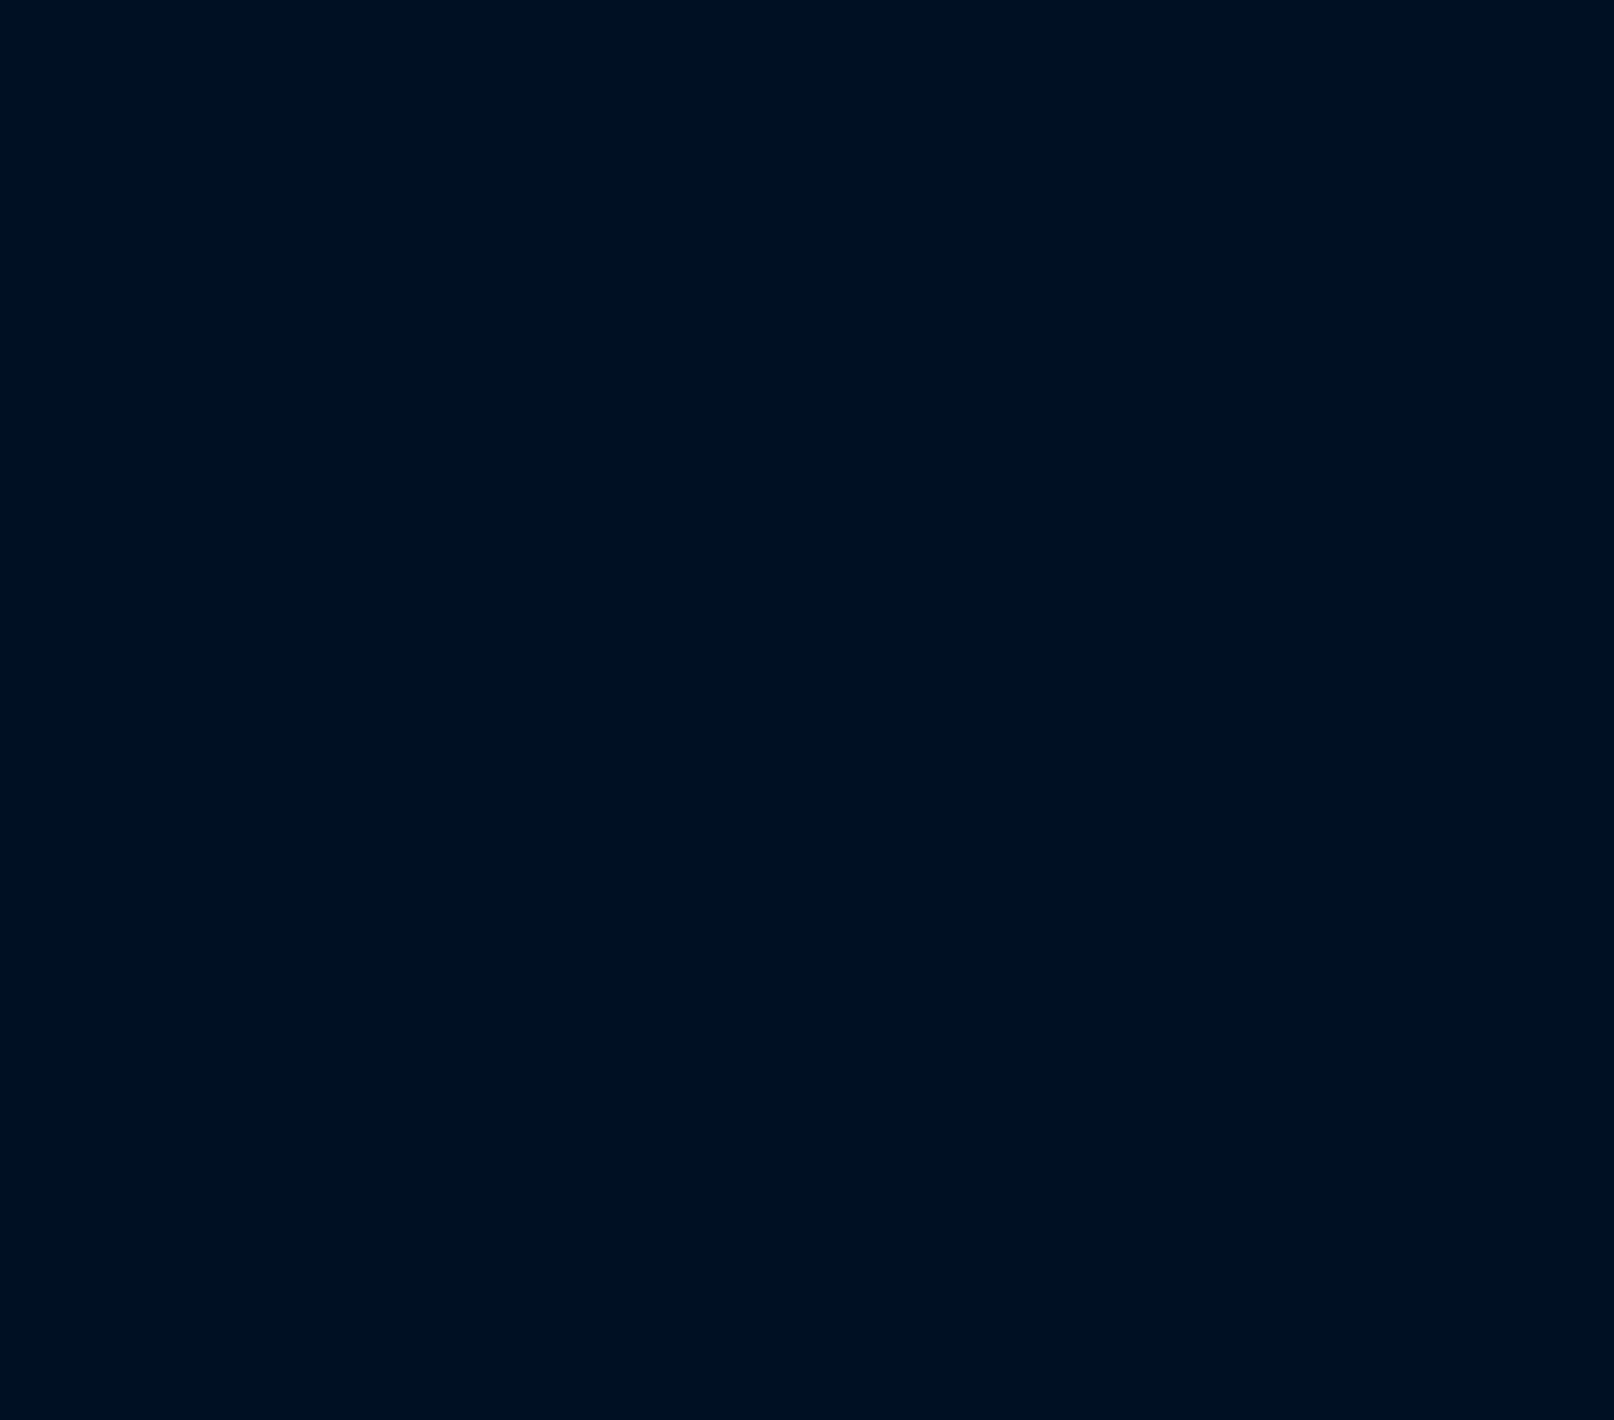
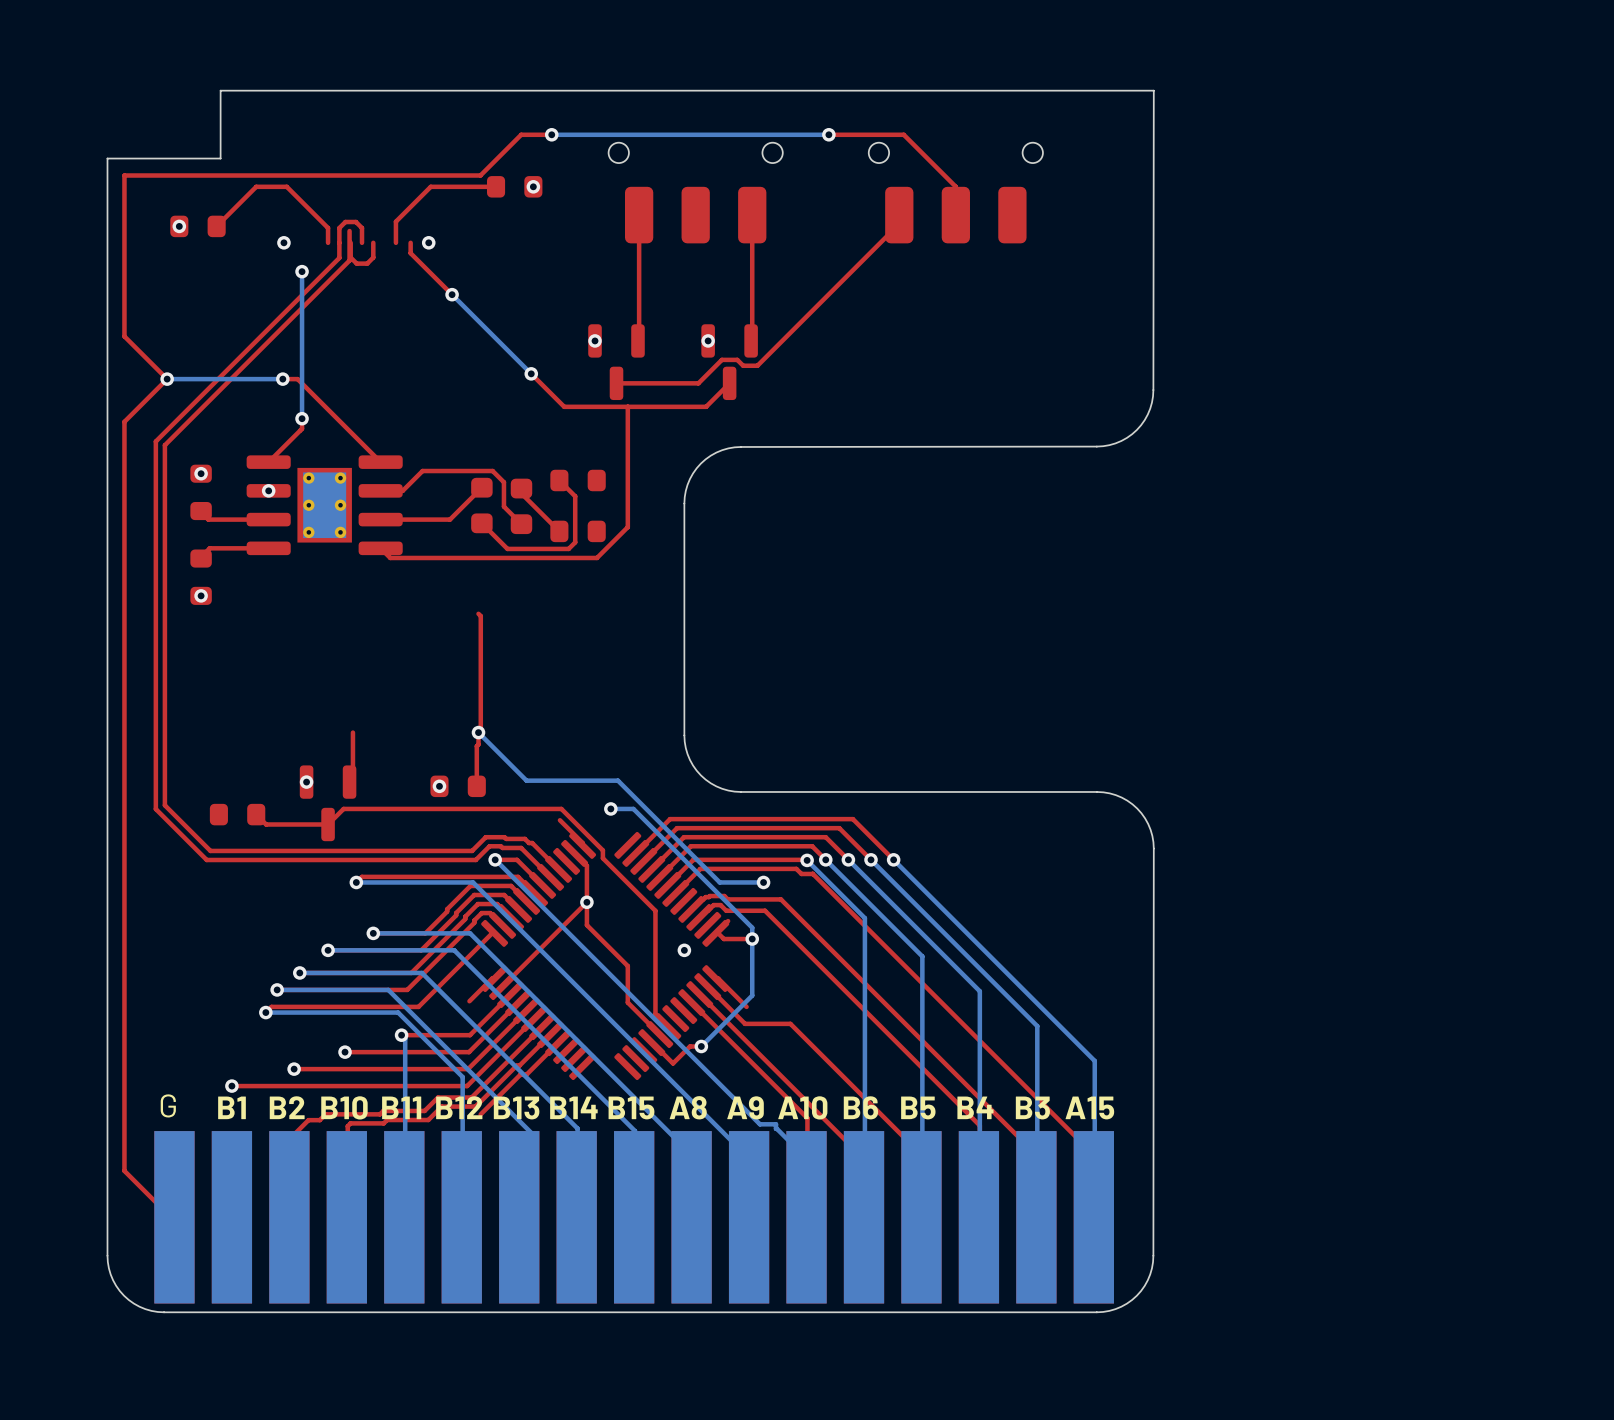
board edge: none -> (1153, 90) (1153, 396) (1147, 414) (1132, 434) (1115, 443) (1096, 446) (734, 447) (710, 455) (696, 468) (687, 484) (684, 503) (684, 741) (693, 765) (710, 783) (722, 788) (740, 791) (1103, 792) (1127, 800) (1145, 818) (1150, 829) (1153, 848) (1153, 1255) (1150, 1274) (1141, 1291) (1121, 1306) (1096, 1312) (164, 1312) (145, 1309) (128, 1299) (113, 1280) (107, 1255) (107, 158) (220, 158) (220, 90) (1153, 90)
top track: none -> (551, 134) (521, 134) (480, 175) (124, 175) (124, 336) (167, 379) (124, 421) (124, 1170) (175, 1221)
via: none -> (551, 134)
top track: none -> (828, 134) (903, 134) (955, 186) (955, 215)
bottom track: none -> (828, 134) (551, 134)
via: none -> (828, 134)
top track: none -> (496, 186) (430, 186) (395, 221) (395, 242)
part: none -> (514, 186)
via: none -> (533, 186)
part: none -> (695, 193)
part: none -> (955, 193)
top track: none -> (639, 215) (638, 340)
top track: none -> (752, 215) (751, 340)
top track: none -> (899, 215) (899, 223) (757, 365) (743, 365) (737, 359) (721, 359) (698, 383) (616, 383)
via: none -> (179, 226)
part: none -> (197, 226)
top track: none -> (216, 226) (256, 186) (286, 186) (328, 228) (328, 242)
top track: none -> (349, 231) (349, 260) (164, 445) (164, 805) (210, 850) (472, 850) (485, 837) (504, 837) (506, 838) (524, 838) (529, 843) (532, 843) (558, 869)
via: none -> (283, 242)
top track: none -> (362, 242) (362, 228) (355, 221) (345, 221) (339, 228) (339, 257) (155, 441) (155, 809) (206, 860) (475, 860) (489, 846) (500, 846) (502, 847) (521, 847) (550, 877)
top track: none -> (373, 242) (373, 257) (367, 263) (356, 263) (350, 257) (350, 242)
top track: none -> (410, 242) (410, 253) (452, 294)
via: none -> (428, 242)
bottom track: none -> (302, 271) (302, 418)
via: none -> (302, 271)
bottom track: none -> (452, 294) (531, 373)
via: none -> (452, 294)
via: none -> (595, 340)
via: none -> (708, 340)
part: none -> (616, 362)
part: none -> (729, 362)
top track: none -> (531, 373) (564, 406) (706, 406) (729, 383)
via: none -> (531, 373)
via: none -> (167, 379)
top track: none -> (282, 379) (297, 379) (380, 462)
bottom track: none -> (282, 379) (167, 379)
via: none -> (282, 379)
top track: none -> (627, 406) (627, 527) (597, 557) (390, 557) (380, 548)
top track: none -> (302, 418) (302, 428) (268, 462)
via: none -> (302, 418)
via: none -> (201, 473)
top track: none -> (559, 480) (575, 496) (575, 542) (568, 548) (507, 548) (481, 523)
part: none -> (578, 480)
top track: none -> (481, 487) (450, 519) (380, 519)
top track: none -> (521, 488) (521, 493) (559, 531)
via: none -> (268, 490)
top track: none -> (380, 490) (402, 490) (422, 471) (492, 471) (503, 482) (503, 506) (521, 524)
part: none -> (201, 492)
part: none -> (324, 505)
part: none -> (481, 505)
part: none -> (521, 506)
top track: none -> (200, 512) (208, 519) (268, 519)
part: none -> (578, 531)
top track: none -> (268, 548) (209, 548) (200, 557)
part: none -> (201, 577)
via: none -> (201, 595)
top track: none -> (478, 613) (480, 616) (480, 730) (478, 732) (476, 746) (476, 786)
top track: none -> (352, 732) (352, 778) (349, 782)
bottom track: none -> (478, 732) (526, 780) (617, 780) (719, 882) (763, 882)
via: none -> (478, 732)
via: none -> (306, 782)
via: none -> (439, 786)
part: none -> (458, 786)
part: none -> (328, 803)
bottom track: none -> (610, 808) (633, 808) (752, 927) (752, 995) (701, 1046)
via: none -> (610, 808)
part: none -> (237, 814)
top track: none -> (256, 814) (266, 824) (328, 824) (343, 808) (561, 808) (602, 850) (602, 858) (655, 910) (655, 1014) (667, 1026)
top track: none -> (559, 820) (582, 842) (582, 845)
top track: none -> (574, 853) (586, 865) (586, 925) (627, 966) (627, 1002) (659, 1034)
top track: none -> (635, 853) (670, 819) (852, 819) (893, 859)
top track: none -> (495, 859) (517, 859) (542, 885)
bottom track: none -> (495, 859) (759, 1124) (776, 1124) (776, 1128) (807, 1159) (807, 1221)
via: none -> (495, 859)
top track: none -> (825, 859) (812, 846) (690, 846) (659, 877)
bottom track: none -> (825, 859) (922, 956) (922, 1221)
via: none -> (825, 859)
top track: none -> (848, 859) (825, 837) (683, 837) (651, 869)
bottom track: none -> (848, 859) (979, 991) (979, 1221)
via: none -> (848, 859)
top track: none -> (871, 859) (839, 828) (677, 828) (643, 861)
bottom track: none -> (871, 859) (1037, 1026) (1037, 1221)
via: none -> (871, 859)
bottom track: none -> (893, 859) (1094, 1060) (1094, 1221)
via: none -> (893, 859)
top track: none -> (807, 860) (693, 859) (667, 885)
bottom track: none -> (807, 860) (864, 918) (864, 1221)
via: none -> (807, 860)
top track: none -> (812, 873) (1094, 1155) (1094, 1221)
top track: none -> (812, 873) (801, 873) (796, 868) (700, 868) (675, 893)
top track: none -> (356, 882) (361, 876) (518, 876) (534, 893)
bottom track: none -> (356, 882) (473, 882) (749, 1159) (749, 1221)
via: none -> (356, 882)
via: none -> (763, 882)
top track: none -> (526, 901) (511, 885) (470, 885) (425, 933) (373, 933)
top track: none -> (586, 902) (502, 986)
via: none -> (586, 902)
top track: none -> (518, 909) (504, 894) (474, 894) (421, 950) (328, 950)
top track: none -> (691, 909) (701, 899) (709, 896) (724, 896) (727, 899) (780, 899) (1037, 1155) (1037, 1221)
top track: none -> (510, 917) (497, 904) (477, 904) (411, 972) (299, 972)
top track: none -> (699, 917) (713, 905) (720, 905) (726, 910) (765, 910) (979, 1125) (979, 1221)
top track: none -> (728, 921) (715, 933) (723, 939) (752, 939)
top track: none -> (502, 925) (490, 913) (481, 913) (407, 989) (277, 989)
bottom track: none -> (373, 933) (470, 933) (692, 1155) (692, 1221)
via: none -> (373, 933)
top track: none -> (494, 933) (492, 933) (418, 1006) (271, 1006) (265, 1012)
via: none -> (752, 939)
bottom track: none -> (328, 950) (454, 950) (635, 1131) (635, 1221)
via: none -> (328, 950)
via: none -> (684, 950)
part: none -> (605, 955)
bottom track: none -> (299, 972) (421, 972) (577, 1128) (577, 1221)
via: none -> (299, 972)
top track: none -> (494, 978) (492, 978) (469, 1001)
top track: none -> (715, 978) (718, 978) (746, 1006)
top track: none -> (707, 986) (745, 1023) (790, 1023) (922, 1155) (922, 1221)
bottom track: none -> (277, 989) (388, 989) (531, 1133) (531, 1221)
via: none -> (277, 989)
top track: none -> (510, 994) (470, 1035) (401, 1035)
top track: none -> (699, 994) (864, 1159) (864, 1221)
top track: none -> (518, 1002) (469, 1052) (345, 1052)
top track: none -> (691, 1002) (807, 1118) (807, 1221)
top track: none -> (526, 1010) (468, 1069) (294, 1069)
bottom track: none -> (265, 1012) (398, 1012) (462, 1077) (462, 1221)
via: none -> (265, 1012)
top track: none -> (534, 1018) (467, 1086) (231, 1086)
top track: none -> (542, 1026) (471, 1097) (438, 1097) (424, 1110) (383, 1110) (379, 1114) (325, 1114) (319, 1120) (308, 1120) (290, 1138) (290, 1221)
top track: none -> (550, 1034) (479, 1103)
bottom track: none -> (401, 1035) (405, 1038) (405, 1221)
via: none -> (401, 1035)
top track: none -> (558, 1042) (526, 1074) (520, 1074) (480, 1114)
top track: none -> (652, 1042) (673, 1063) (690, 1046) (701, 1046)
via: none -> (701, 1046)
via: none -> (345, 1052)
via: none -> (294, 1069)
via: none -> (231, 1086)
top track: none -> (478, 1103) (475, 1106) (441, 1106) (428, 1120) (387, 1120) (383, 1123) (350, 1123) (347, 1126) (347, 1221)
text: none -> G (168, 1105)
text: none -> B1 (231, 1107)
text: none -> B2 (287, 1107)
text: none -> B10 (344, 1107)
text: none -> B11 (401, 1107)
text: none -> B12 (459, 1107)
text: none -> B13 (516, 1107)
text: none -> B14 (573, 1107)
text: none -> B15 (631, 1107)
text: none -> A8 (688, 1107)
text: none -> A9 (745, 1107)
text: none -> A10 (802, 1107)
text: none -> B6 (860, 1107)
text: none -> B5 (918, 1107)
text: none -> B4 (975, 1107)
text: none -> B3 (1032, 1107)
text: none -> A15 (1089, 1107)
part: none -> (634, 1217)

